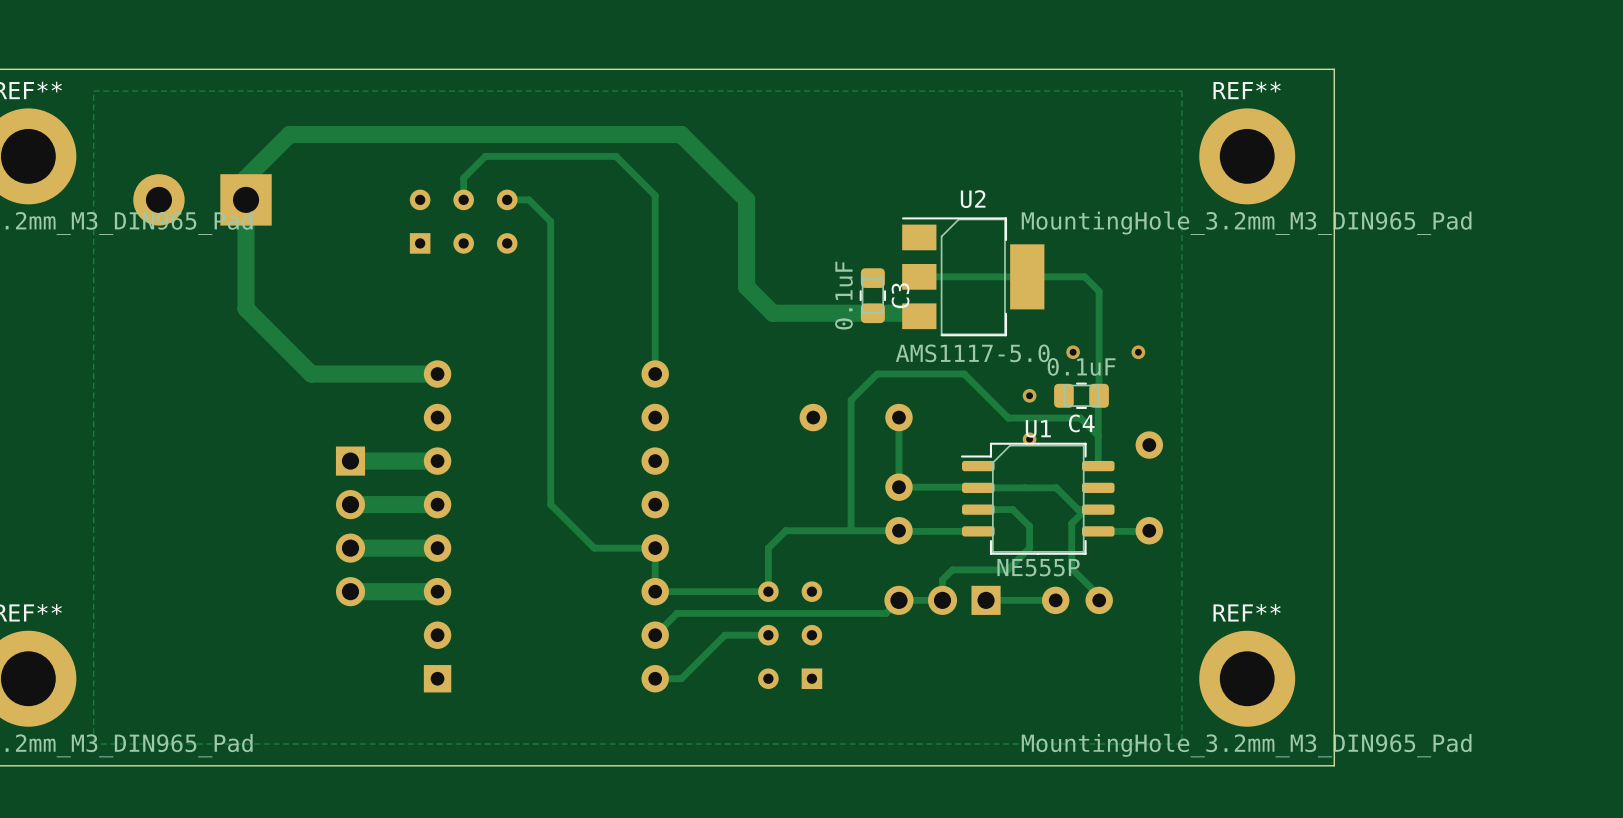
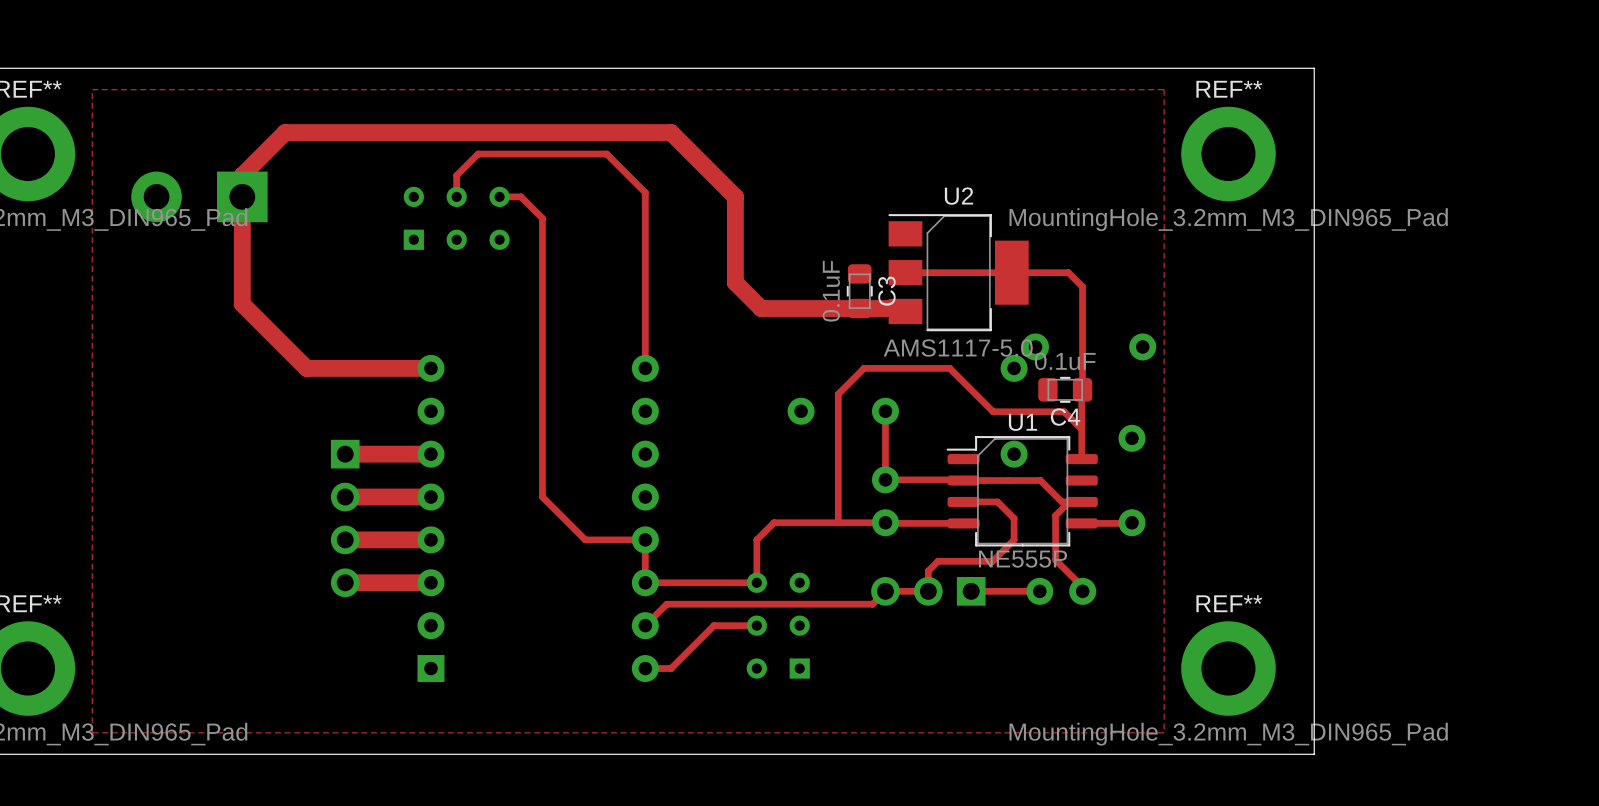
via: none -> (1035, 346)
via: (1073, 352) -> none
via: (1138, 352) -> none
via: none -> (1142, 346)
via: none -> (1014, 368)
via: (1029, 395) -> none
via: (1029, 439) -> none
via: none -> (1014, 454)

